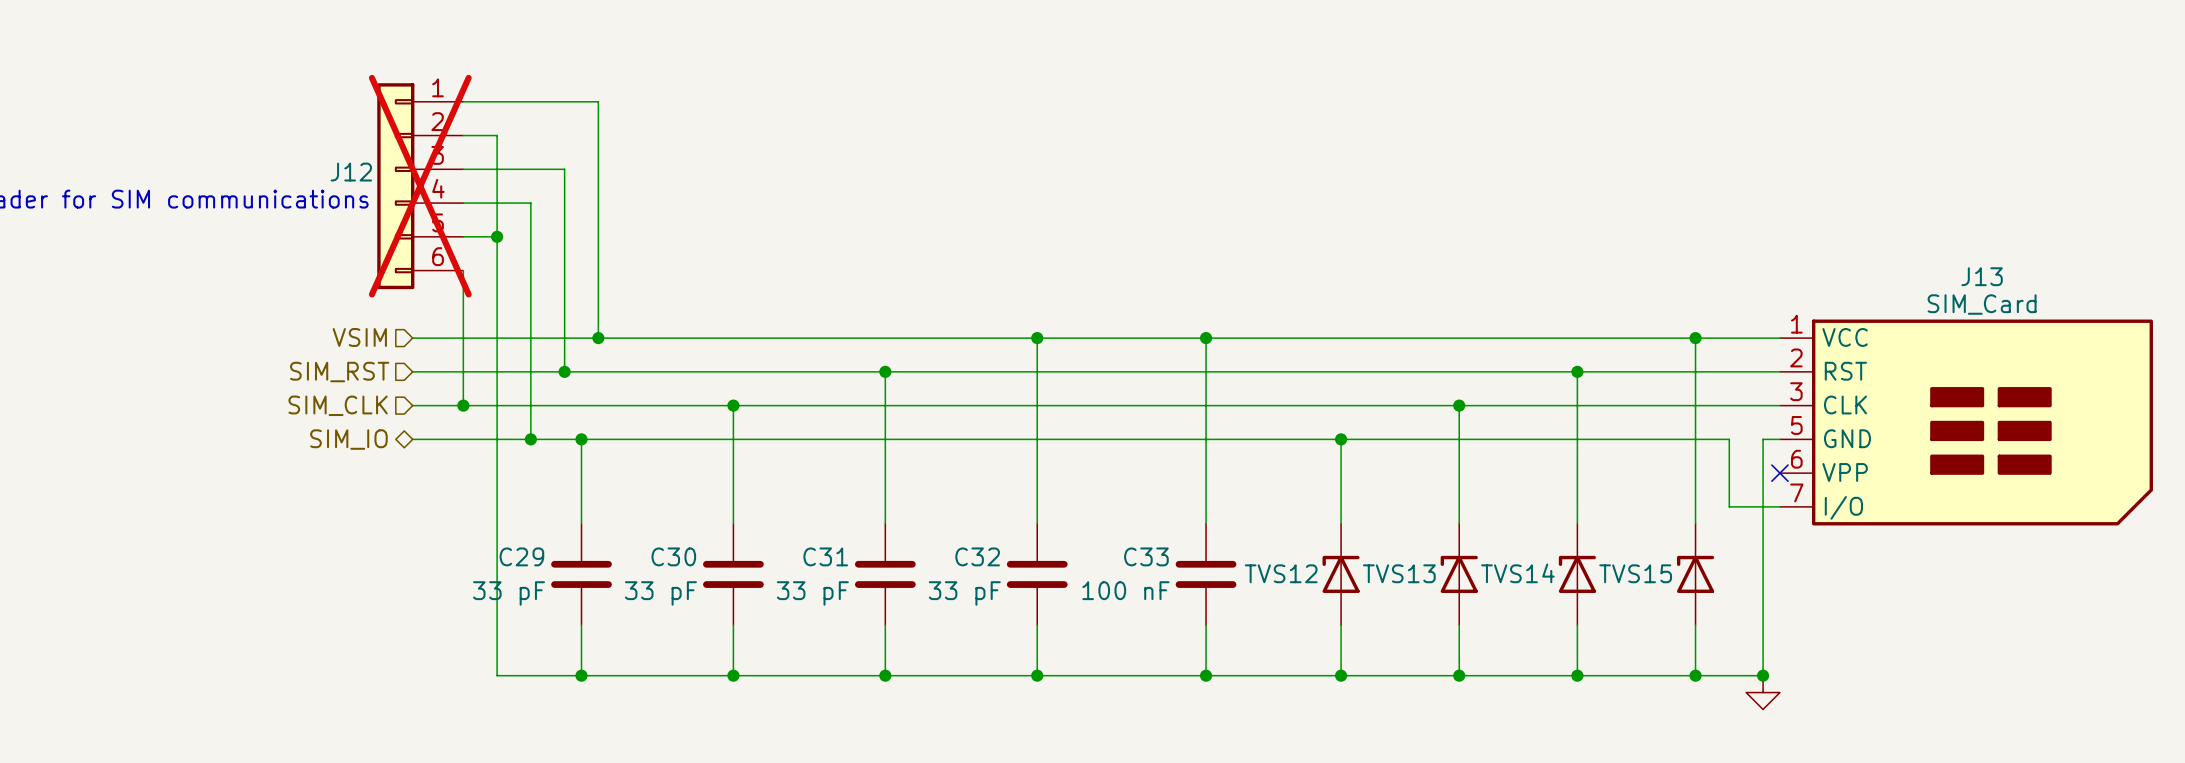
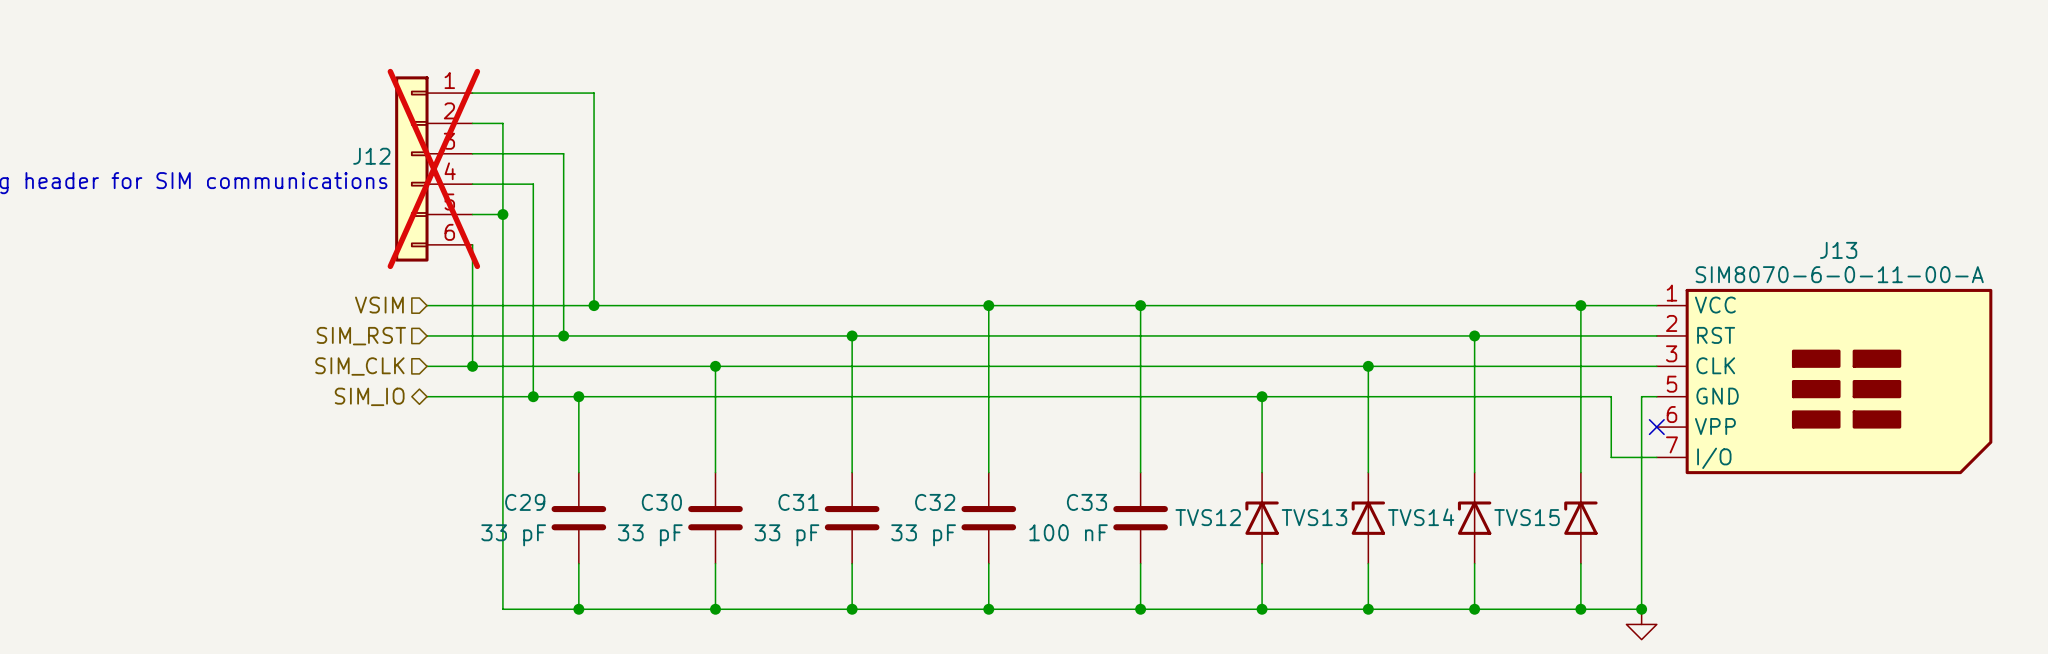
J13 value: SIM_Card (1982, 304) -> SIM8070-6-0-11-00-A (1839, 274)

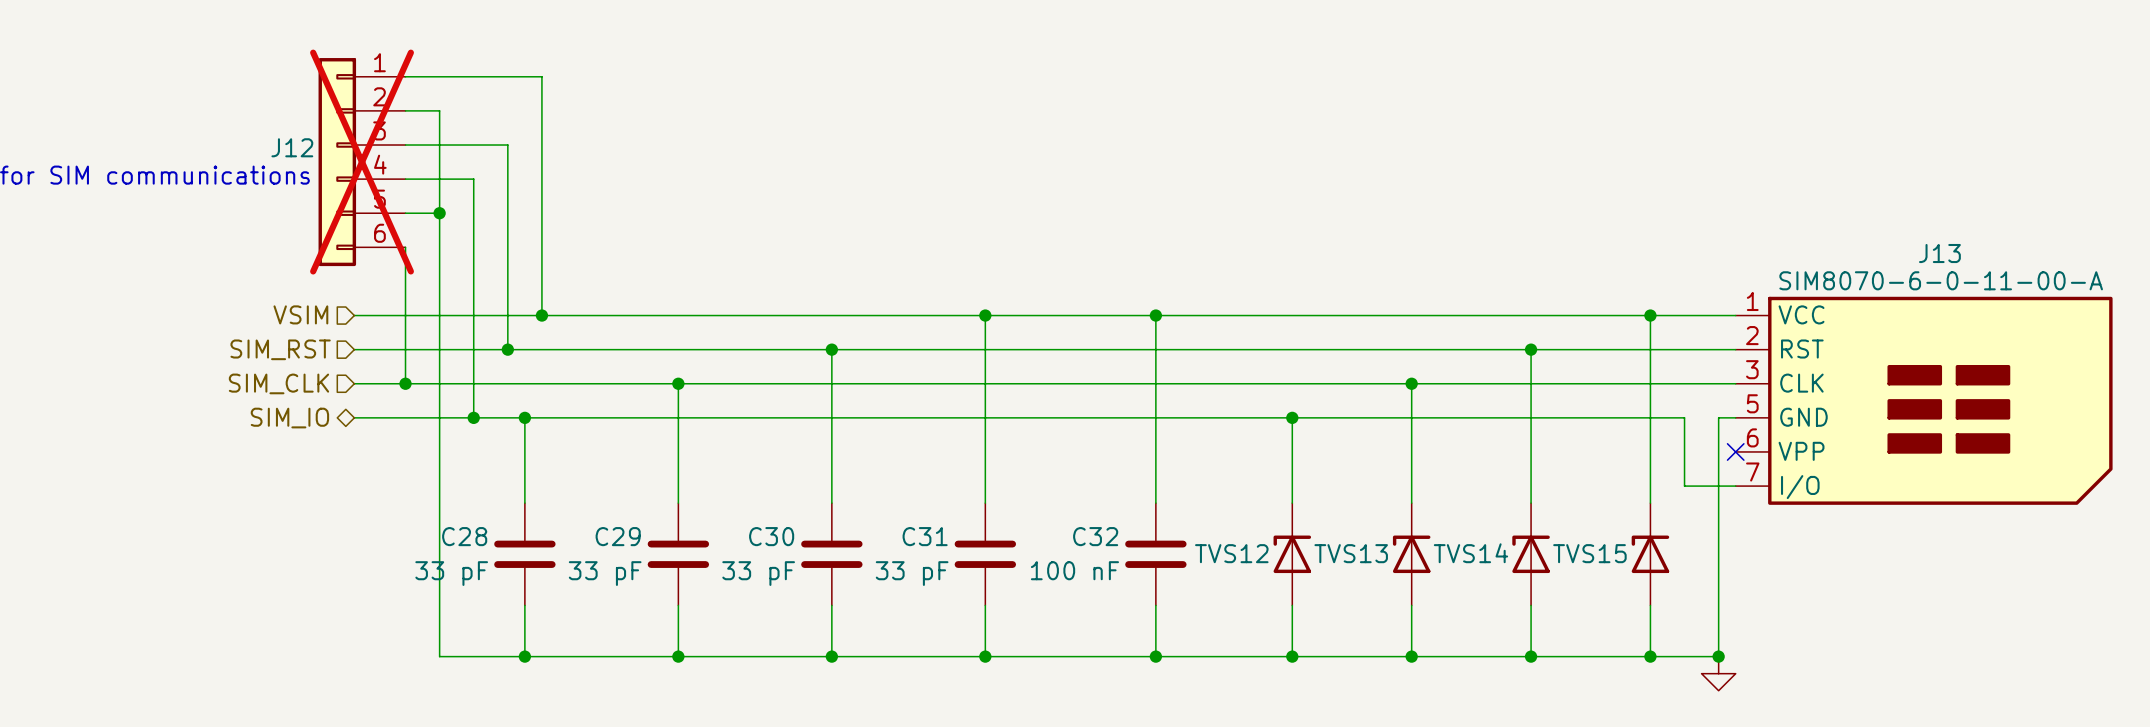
C29 name: C29 (525, 502) -> C28 (464, 536)
C30 name: C30 (661, 502) -> C29 (618, 536)
C31 name: C31 (798, 502) -> C30 (771, 536)
C32 name: C32 (935, 502) -> C31 (925, 536)
C33 name: C33 (1086, 502) -> C32 (1095, 536)

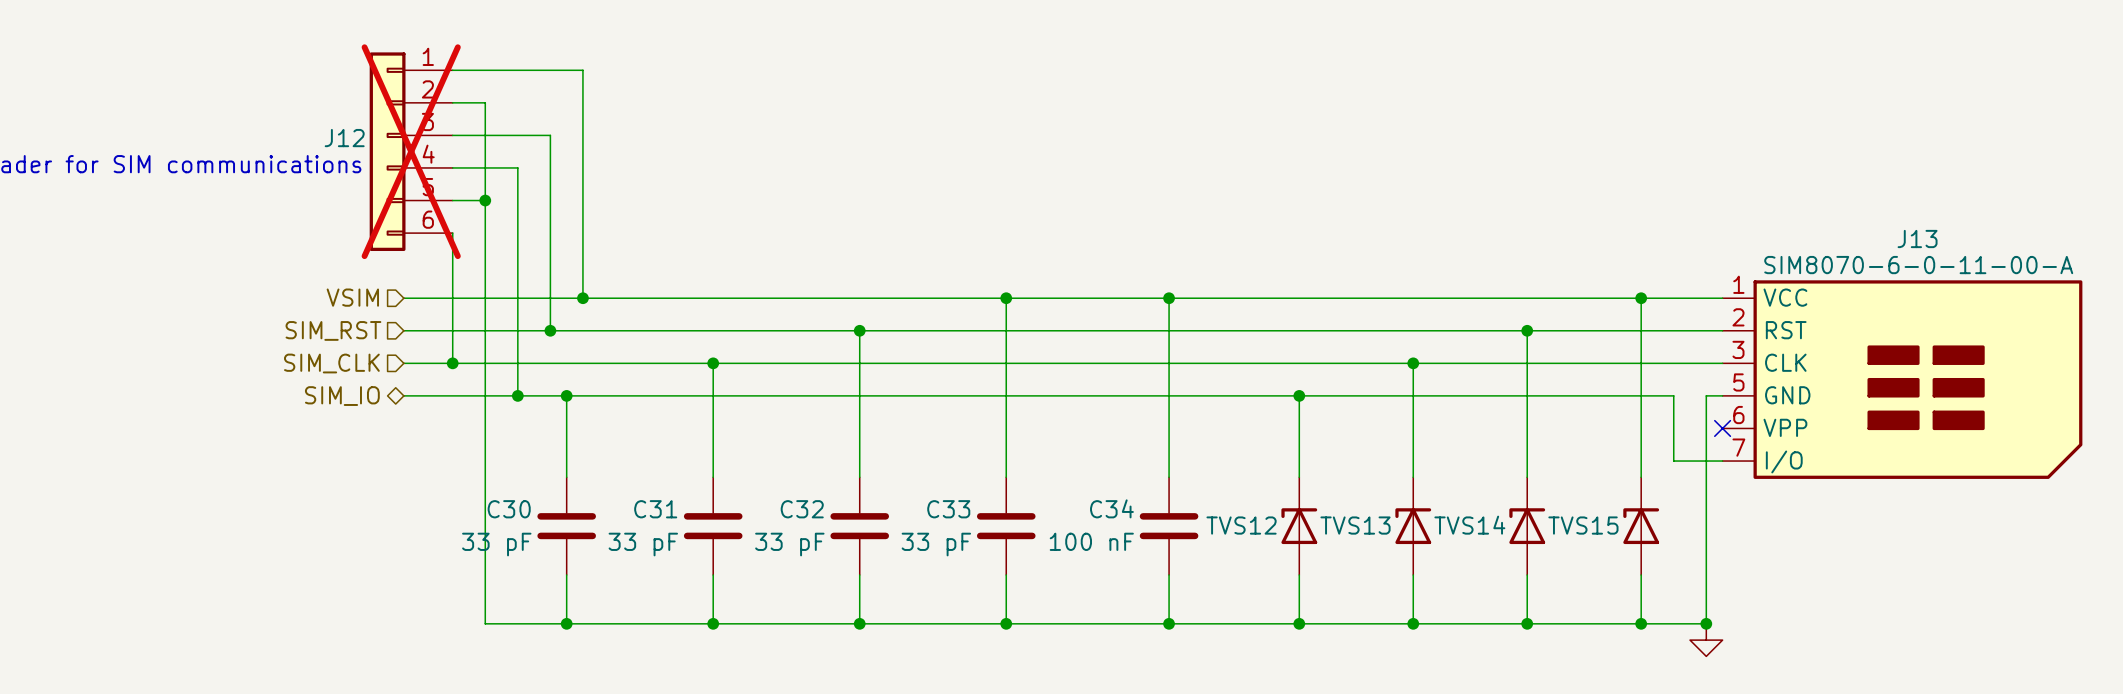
C28 name: C28 (464, 536) -> C30 (509, 509)
C29 name: C29 (618, 536) -> C31 (655, 509)
C30 name: C30 (771, 536) -> C32 (802, 509)
C31 name: C31 (925, 536) -> C33 (948, 509)
C32 name: C32 (1095, 536) -> C34 (1111, 508)

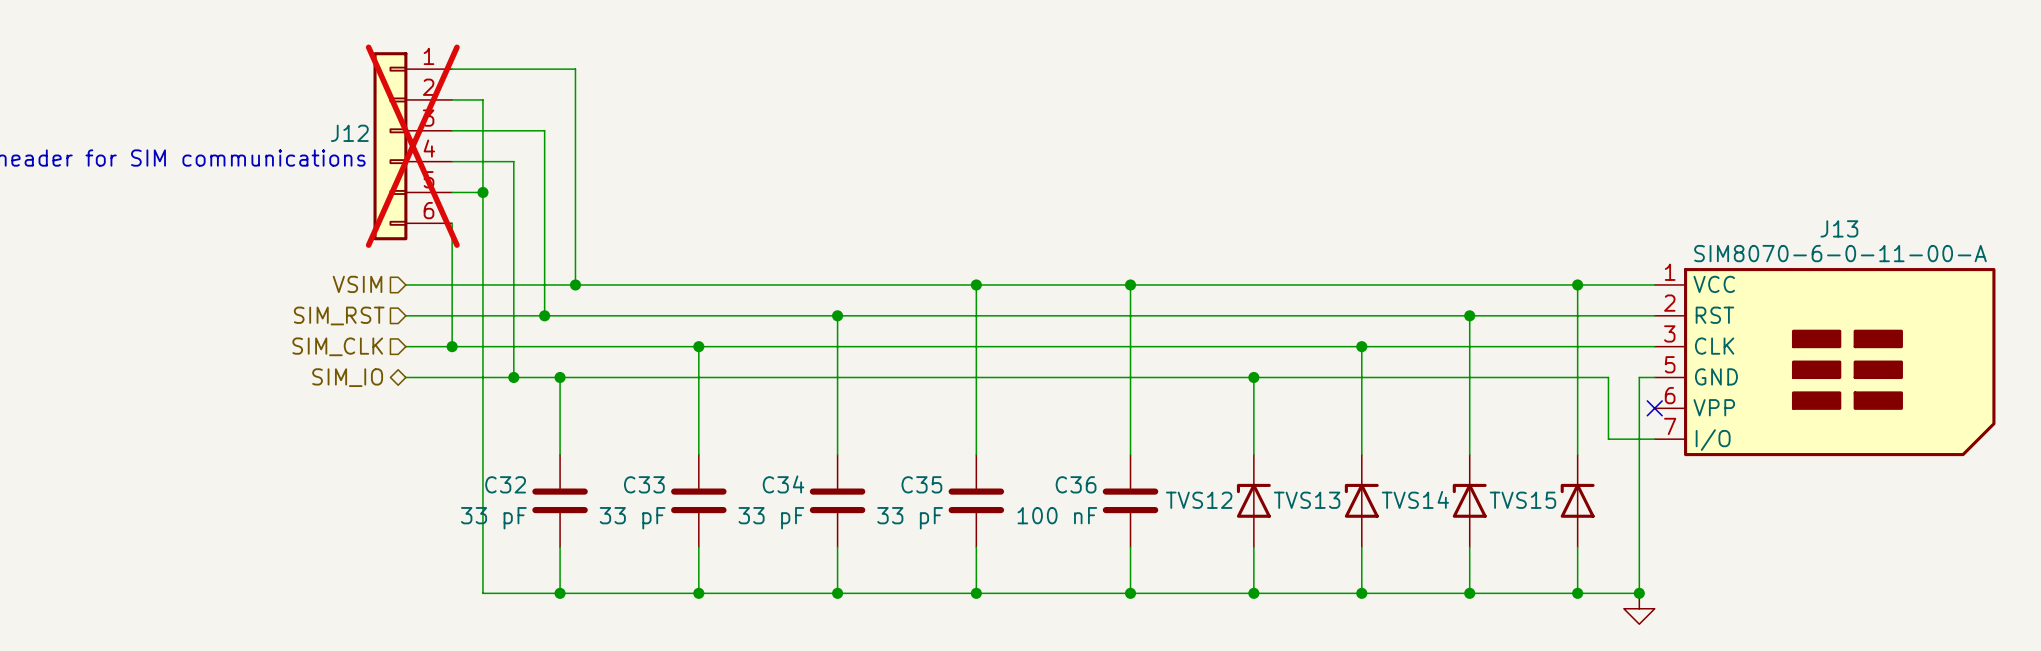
C34 name: C34 (1111, 508) -> C36 (1076, 484)
C30 name: C30 (509, 509) -> C32 (505, 484)
C31 name: C31 (655, 509) -> C33 (644, 484)
C32 name: C32 (802, 509) -> C34 (783, 484)
C33 name: C33 (948, 509) -> C35 (921, 484)

